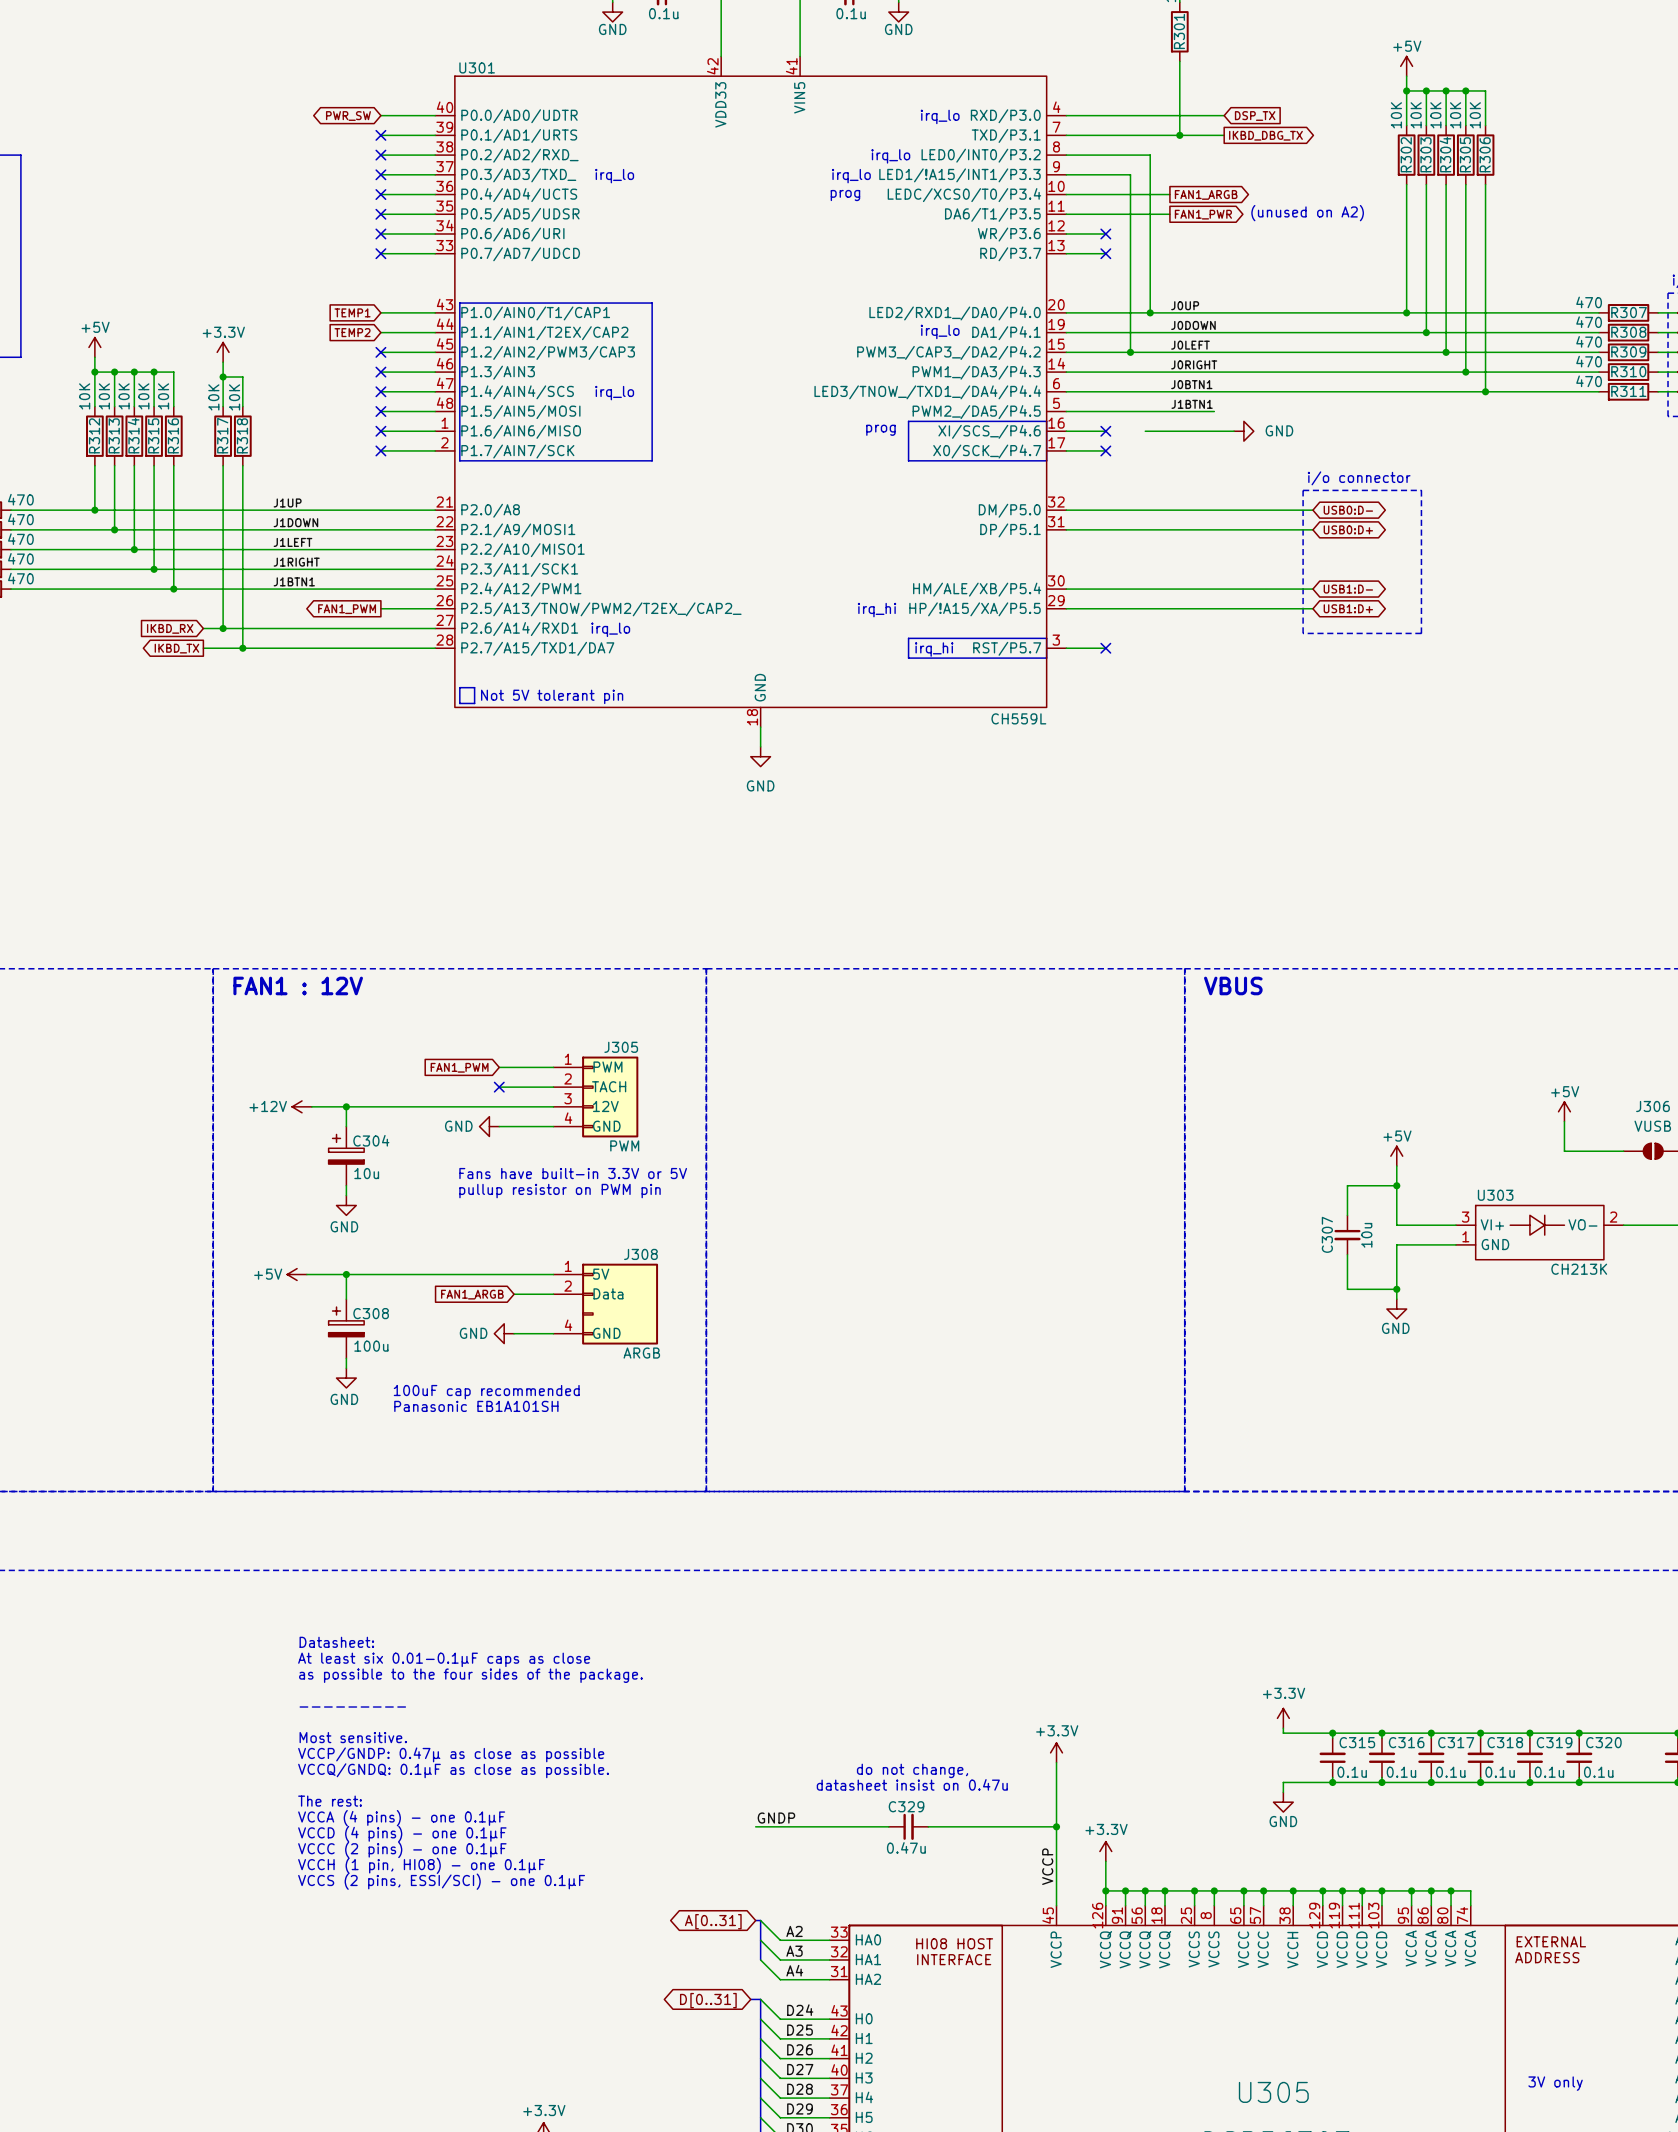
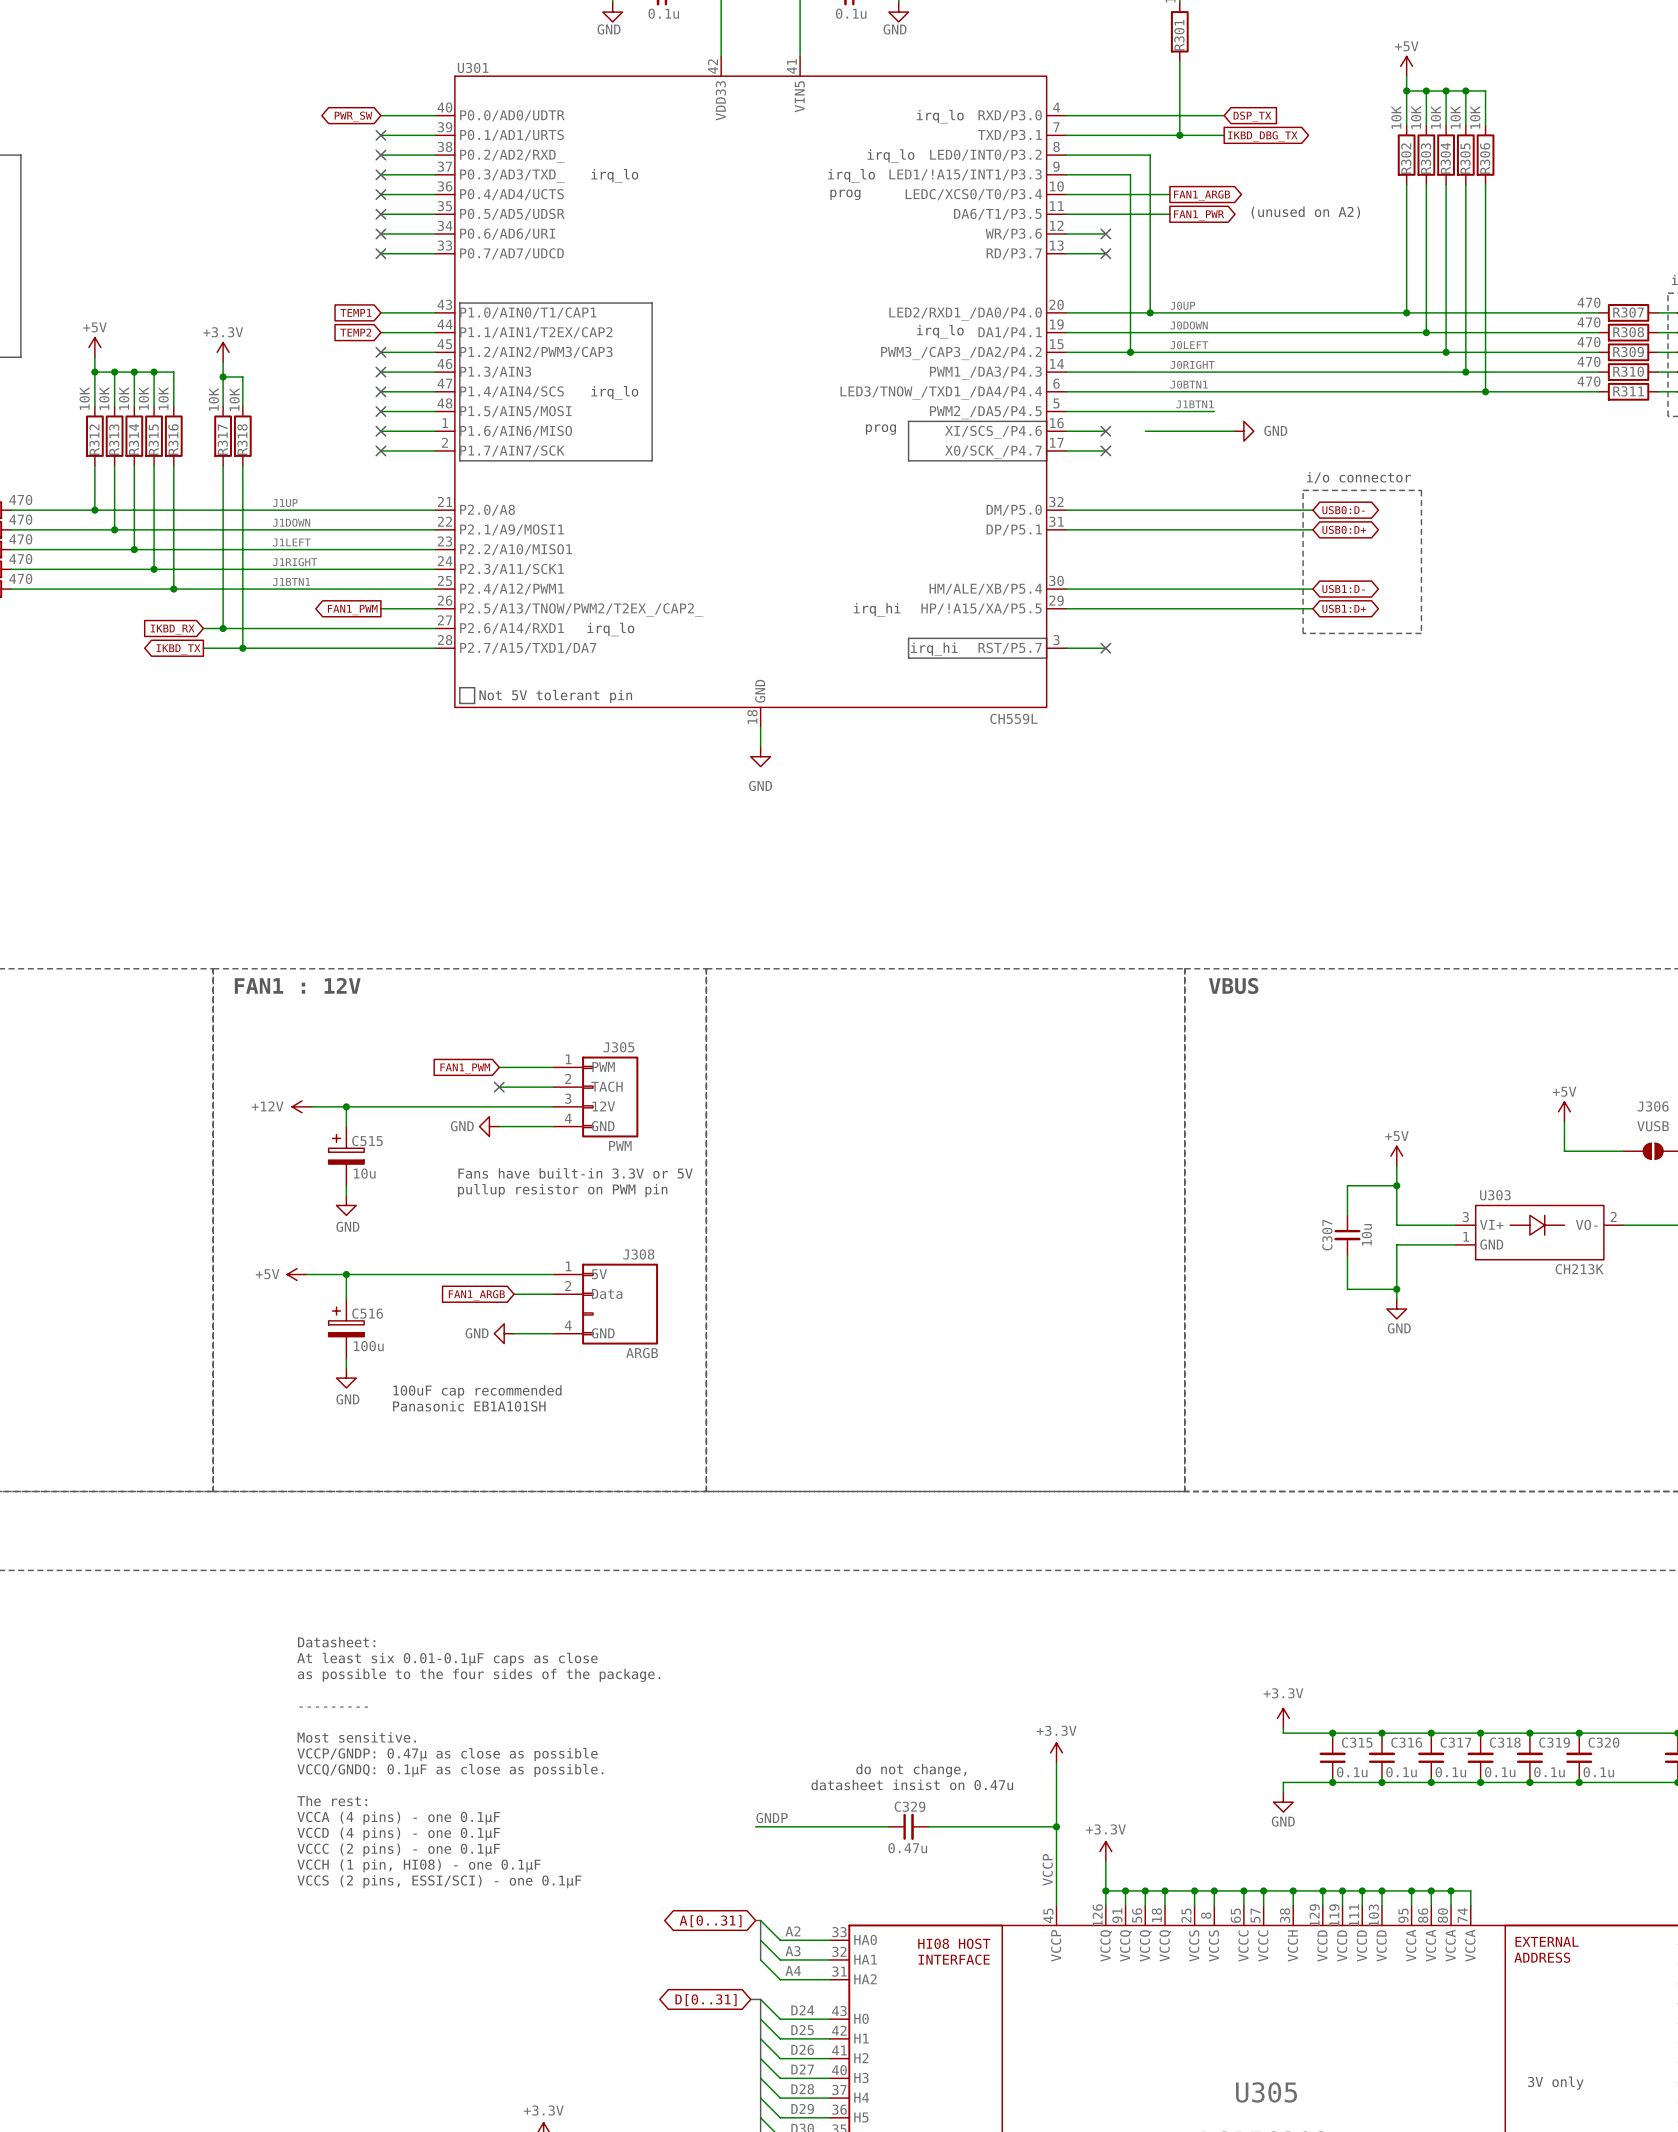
C304 name: C304 (371, 1140) -> C515 (367, 1141)
C308 name: C308 (371, 1313) -> C516 (367, 1313)

